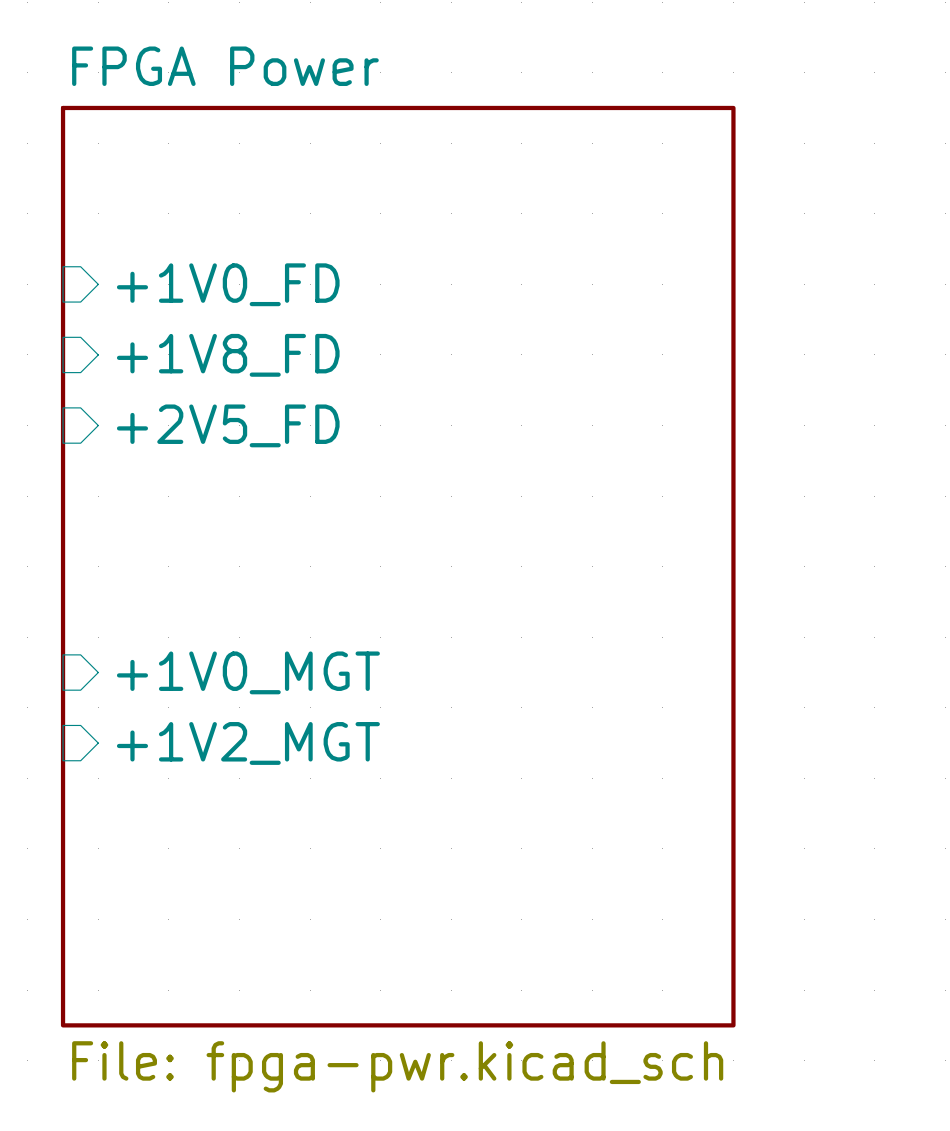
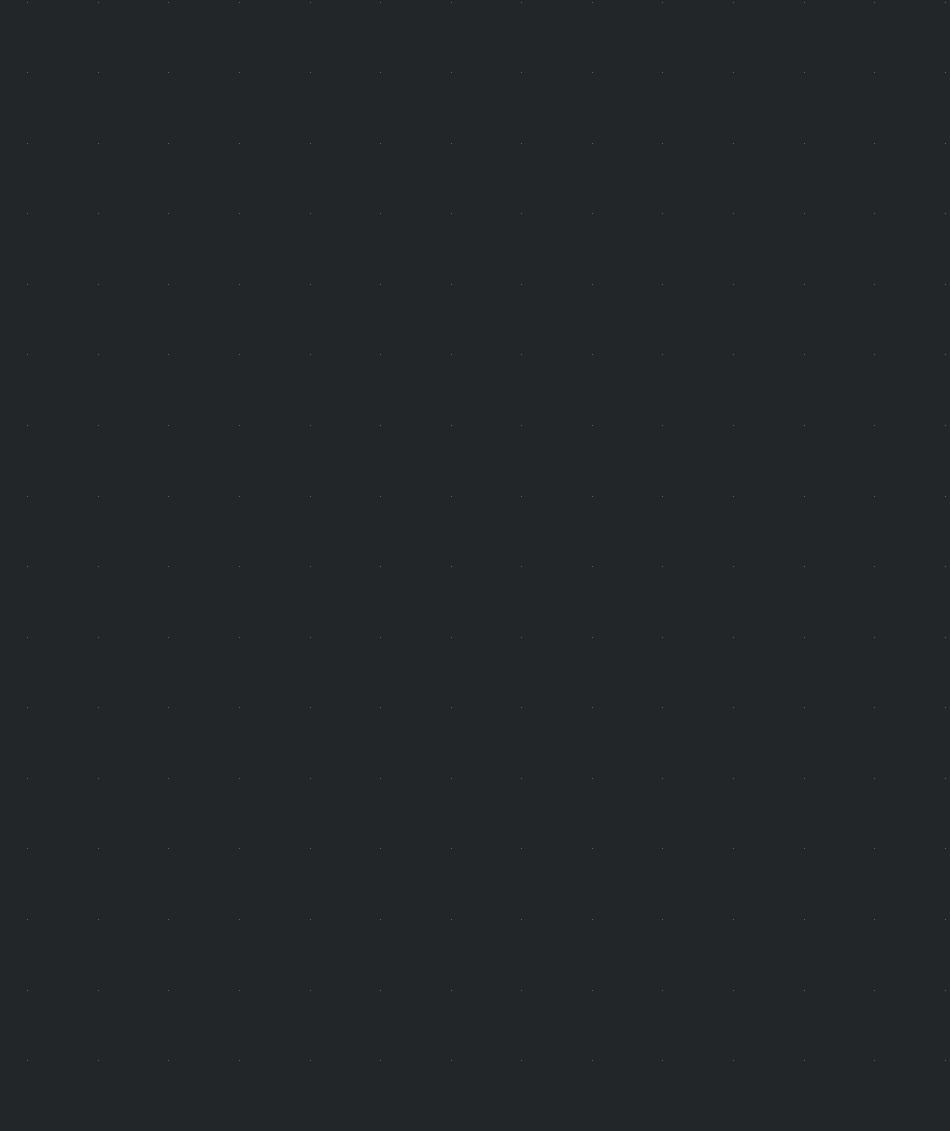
sheet pin: +1V0_FD (228, 284) -> none
sheet pin: +1V8_FD (228, 355) -> none
sheet pin: +2V5_FD (228, 425) -> none
sheet FPGA Power: File: fpga-pwr.kicad_sch (398, 566) -> none
sheet pin: +1V0_MGT (248, 672) -> none
sheet pin: +1V2_MGT (248, 743) -> none

